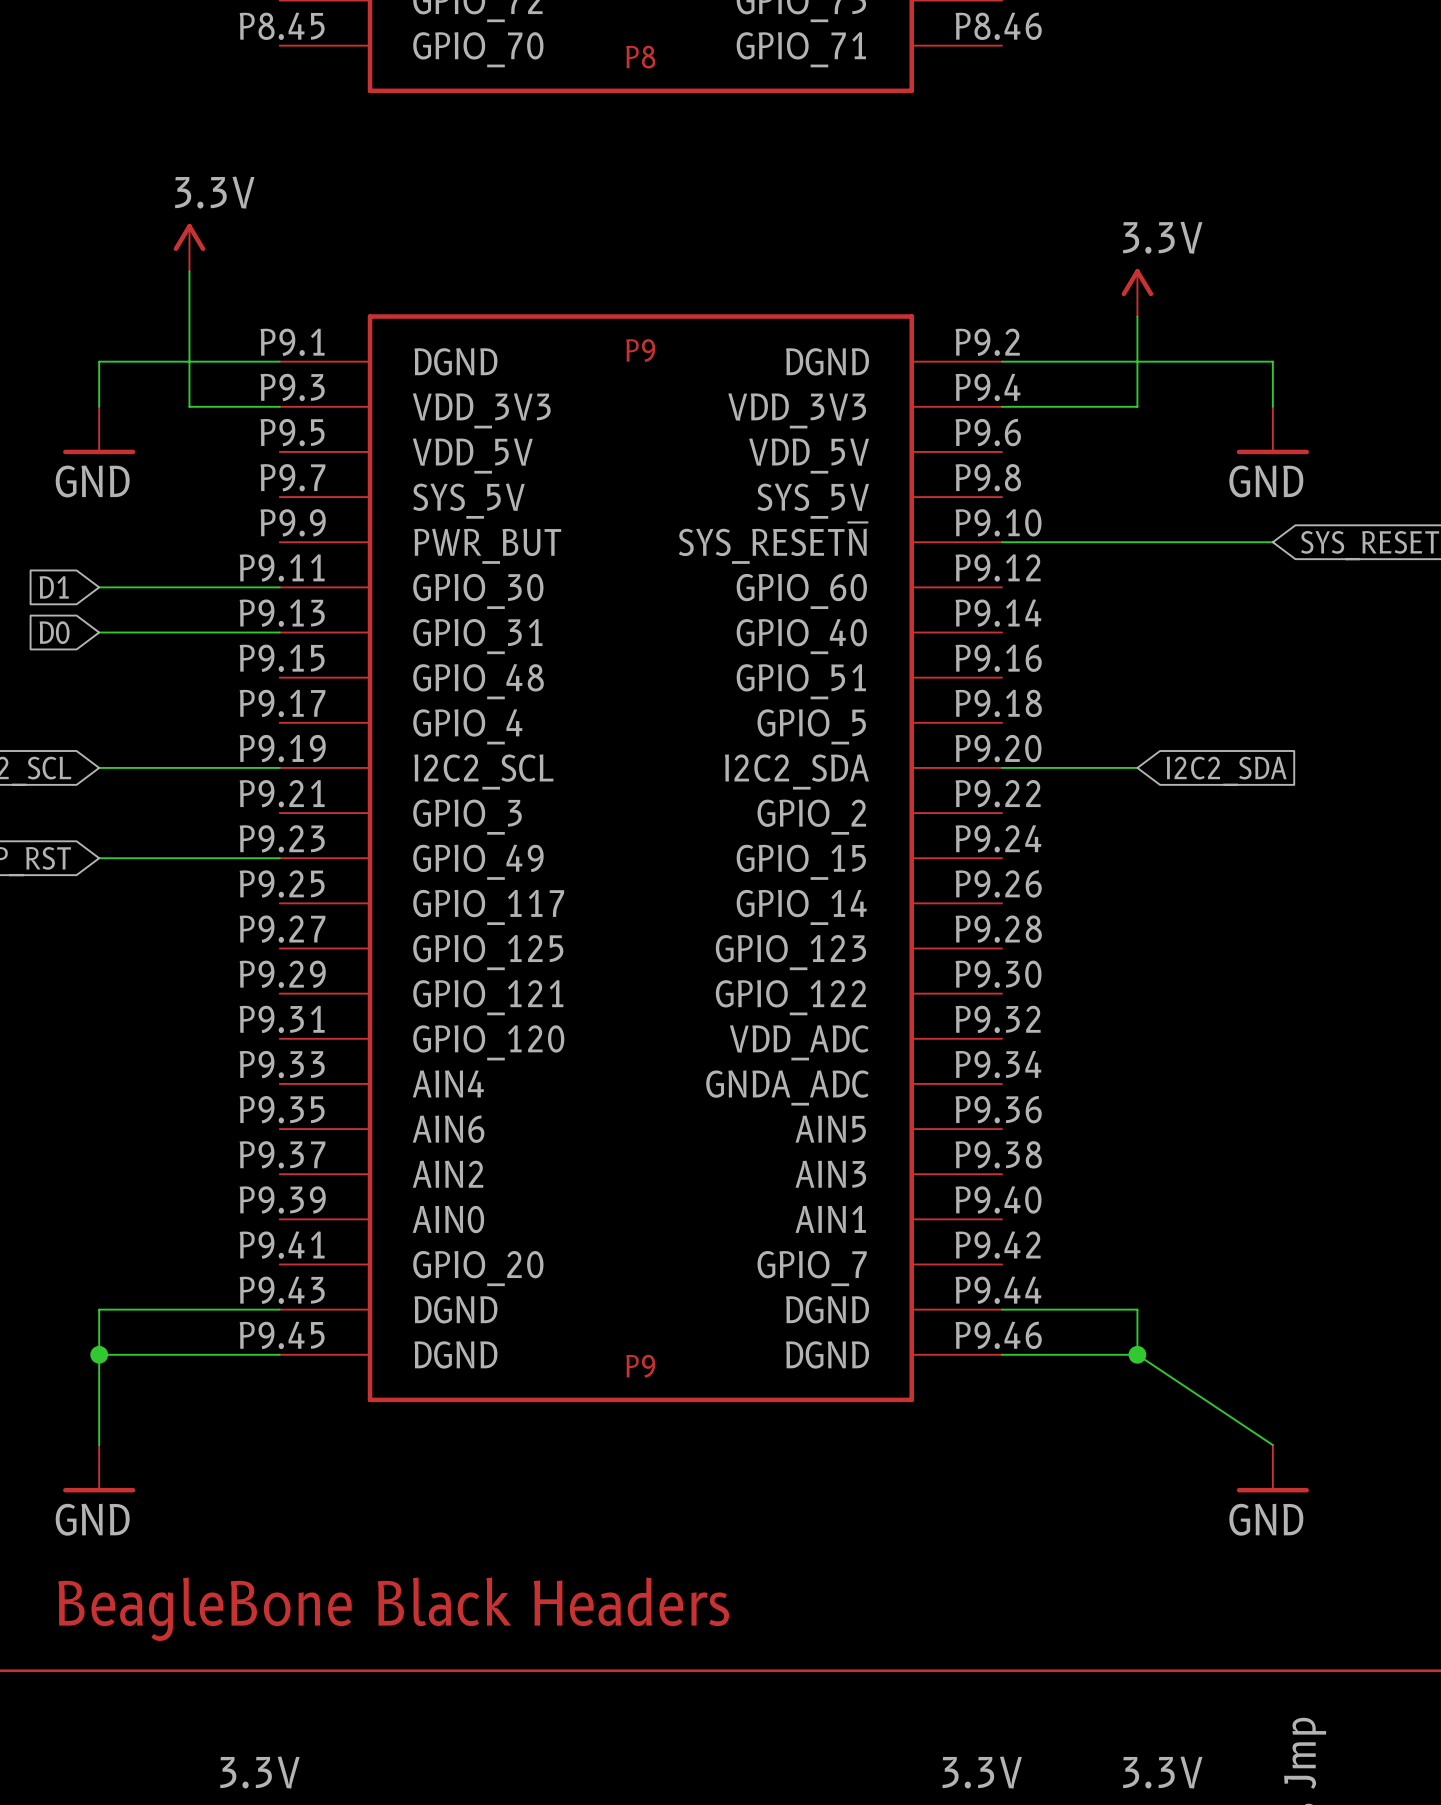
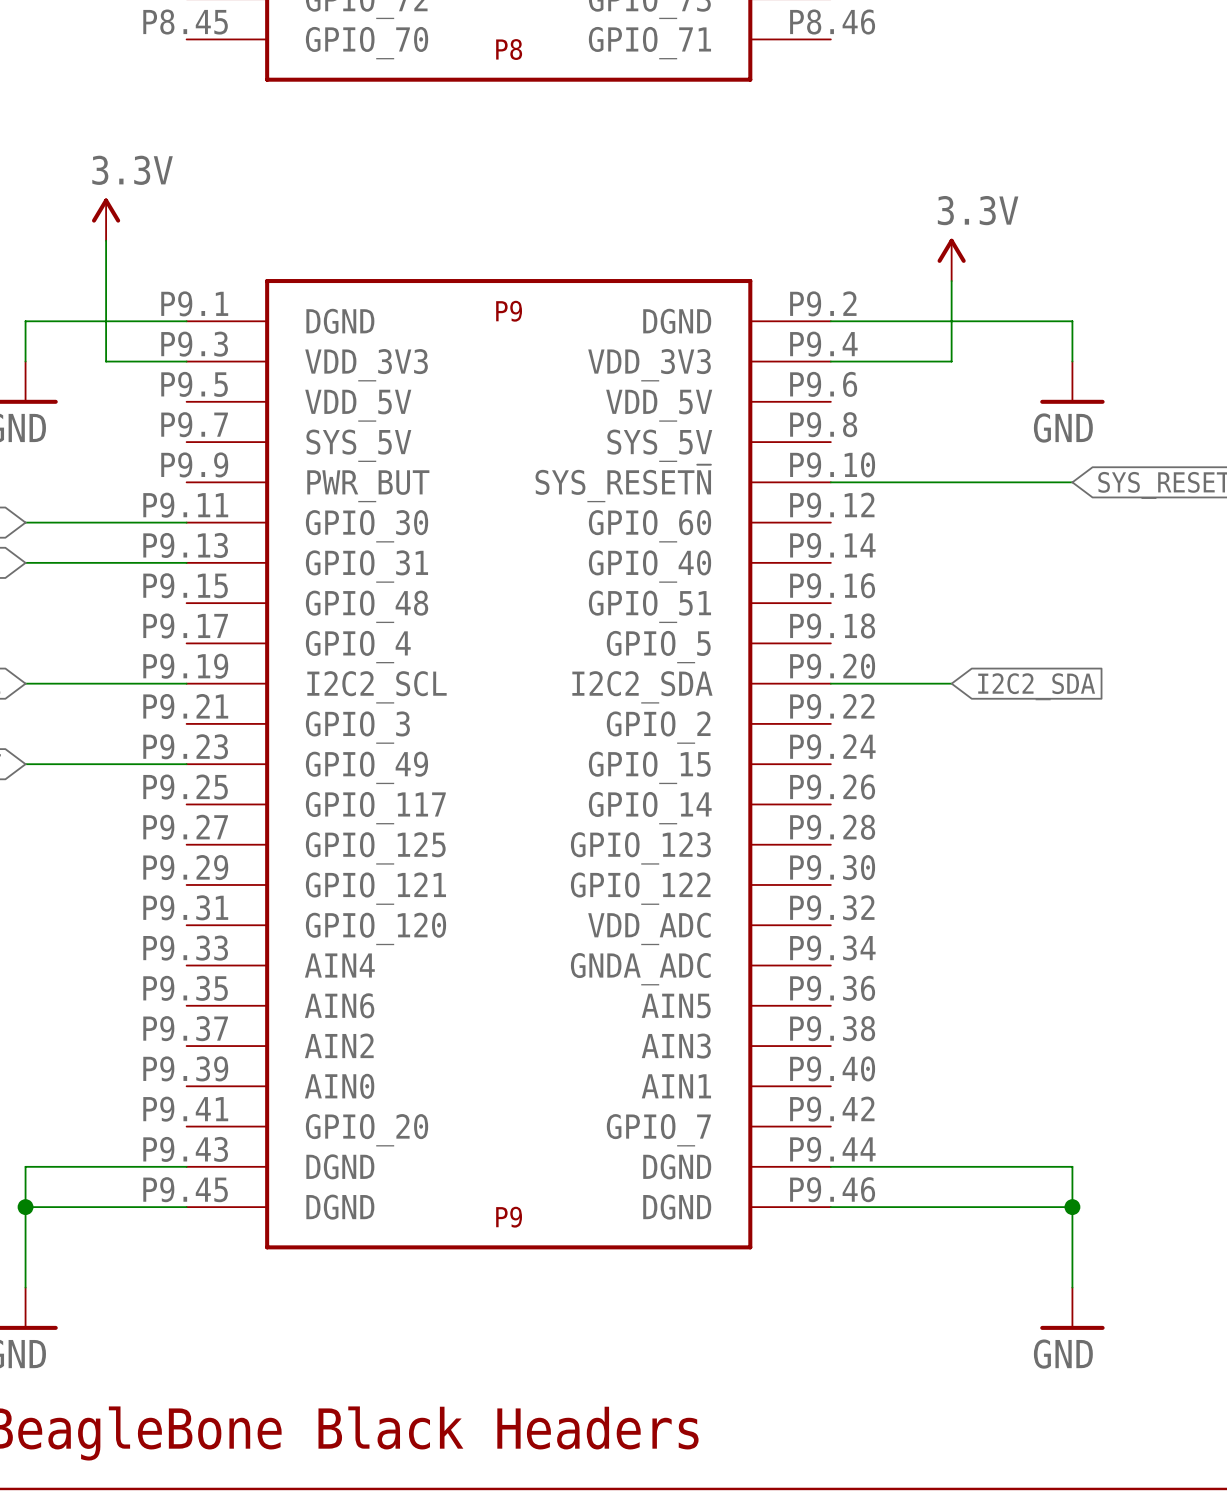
wire: (1137, 1309) (1137, 1354) (1272, 1445) -> (951, 1166) (1072, 1166) (1072, 1287)
wire: none -> (951, 1207) (1072, 1207)
junction: (1137, 1354) -> none
junction: none -> (1072, 1207)

